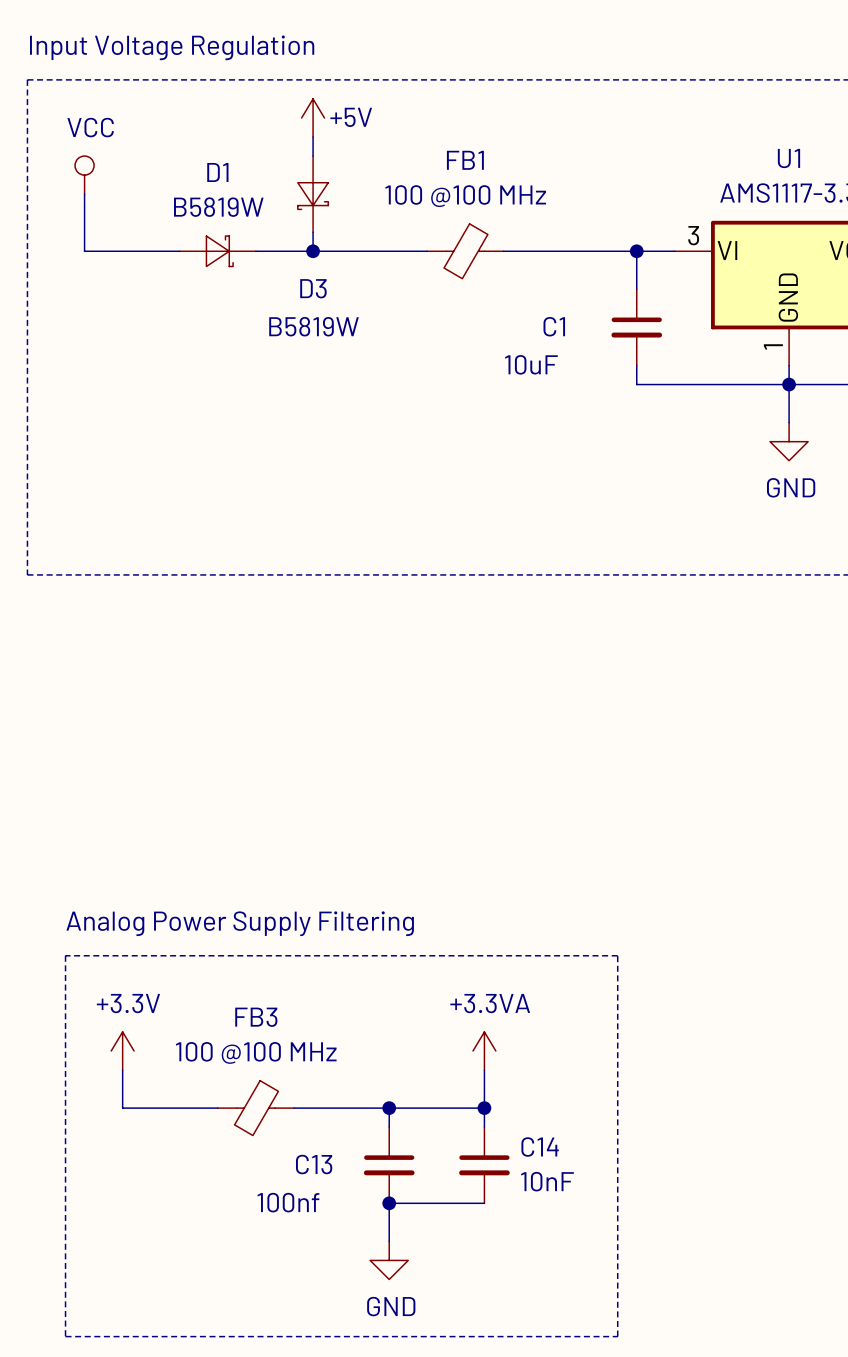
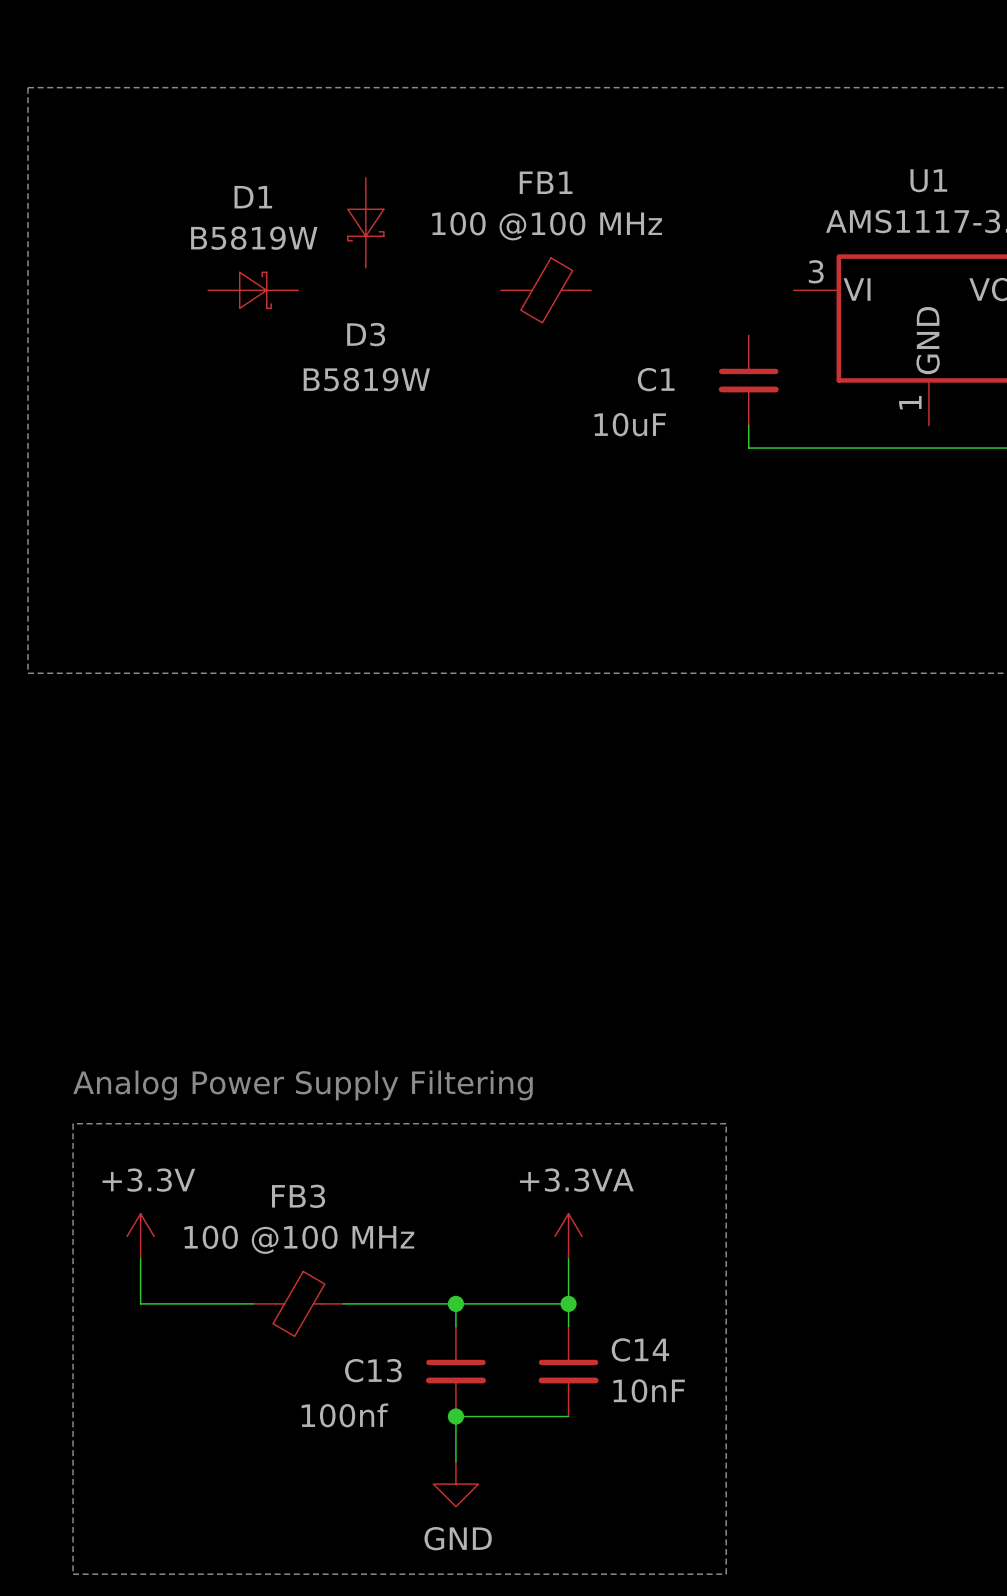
text: Input Voltage Regulation (172, 47) -> none
power symbol: +5V (313, 117) -> none
wire: (313, 137) (313, 156) -> none
power symbol: VCC (84, 175) -> none
wire: (84, 194) (84, 251) (179, 251) -> none
wire: (313, 232) (313, 251) -> none
wire: (255, 251) (427, 251) -> none
junction: (313, 251) -> none
wire: (503, 251) (674, 251) -> none
wire: (636, 251) (636, 289) -> none
junction: (636, 251) -> none
wire: (789, 365) (789, 422) -> none
junction: (789, 384) -> none
power symbol: GND (789, 441) -> none

